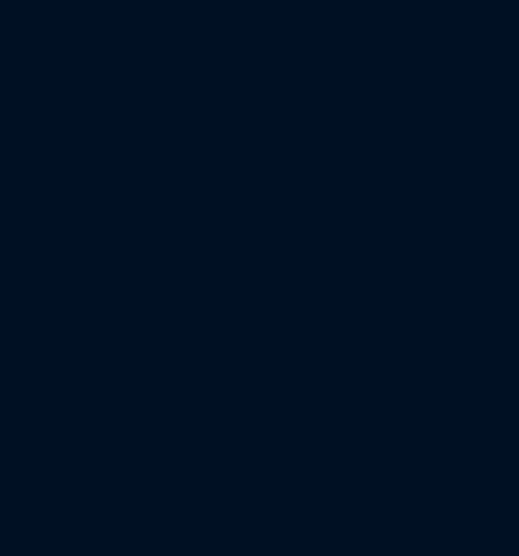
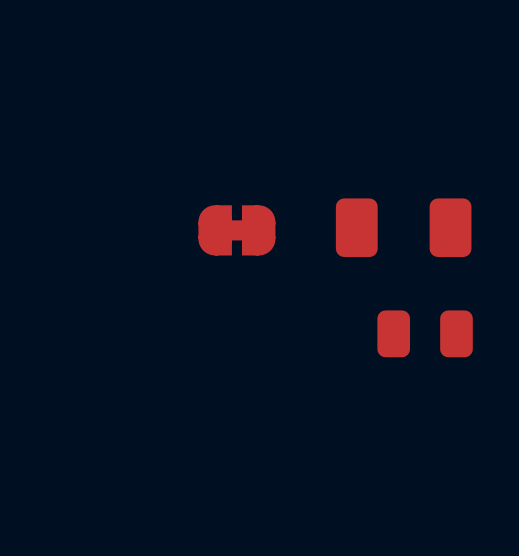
part: none -> (403, 227)
part: none -> (236, 230)
part: none -> (425, 333)

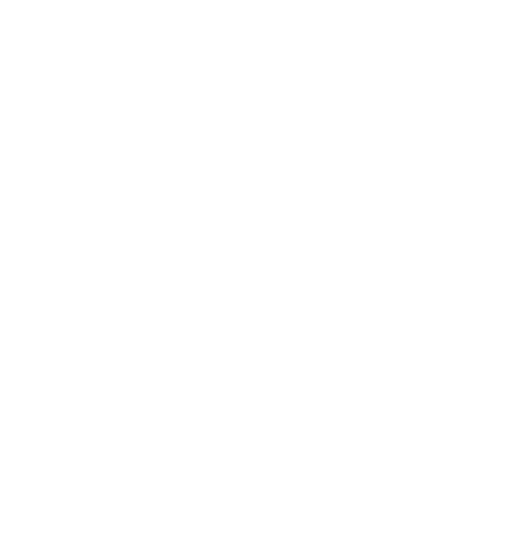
part: (403, 227) -> none
part: (236, 230) -> none
part: (425, 333) -> none

